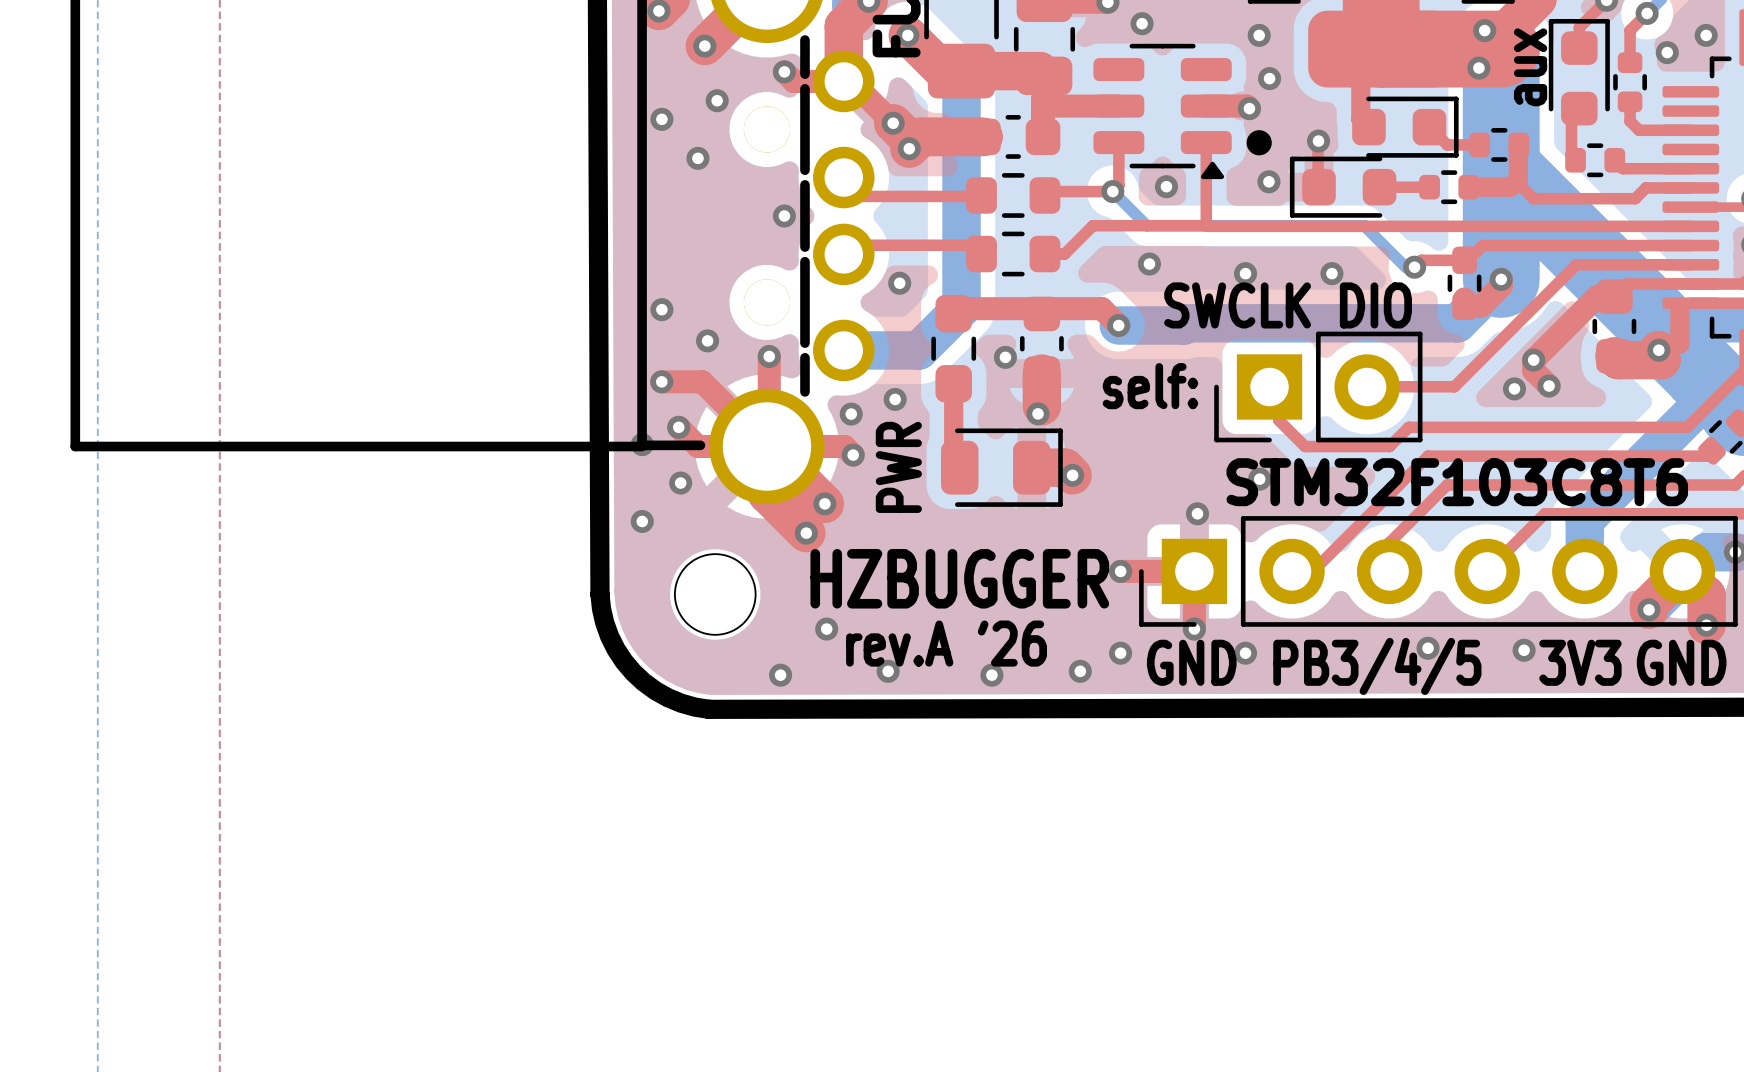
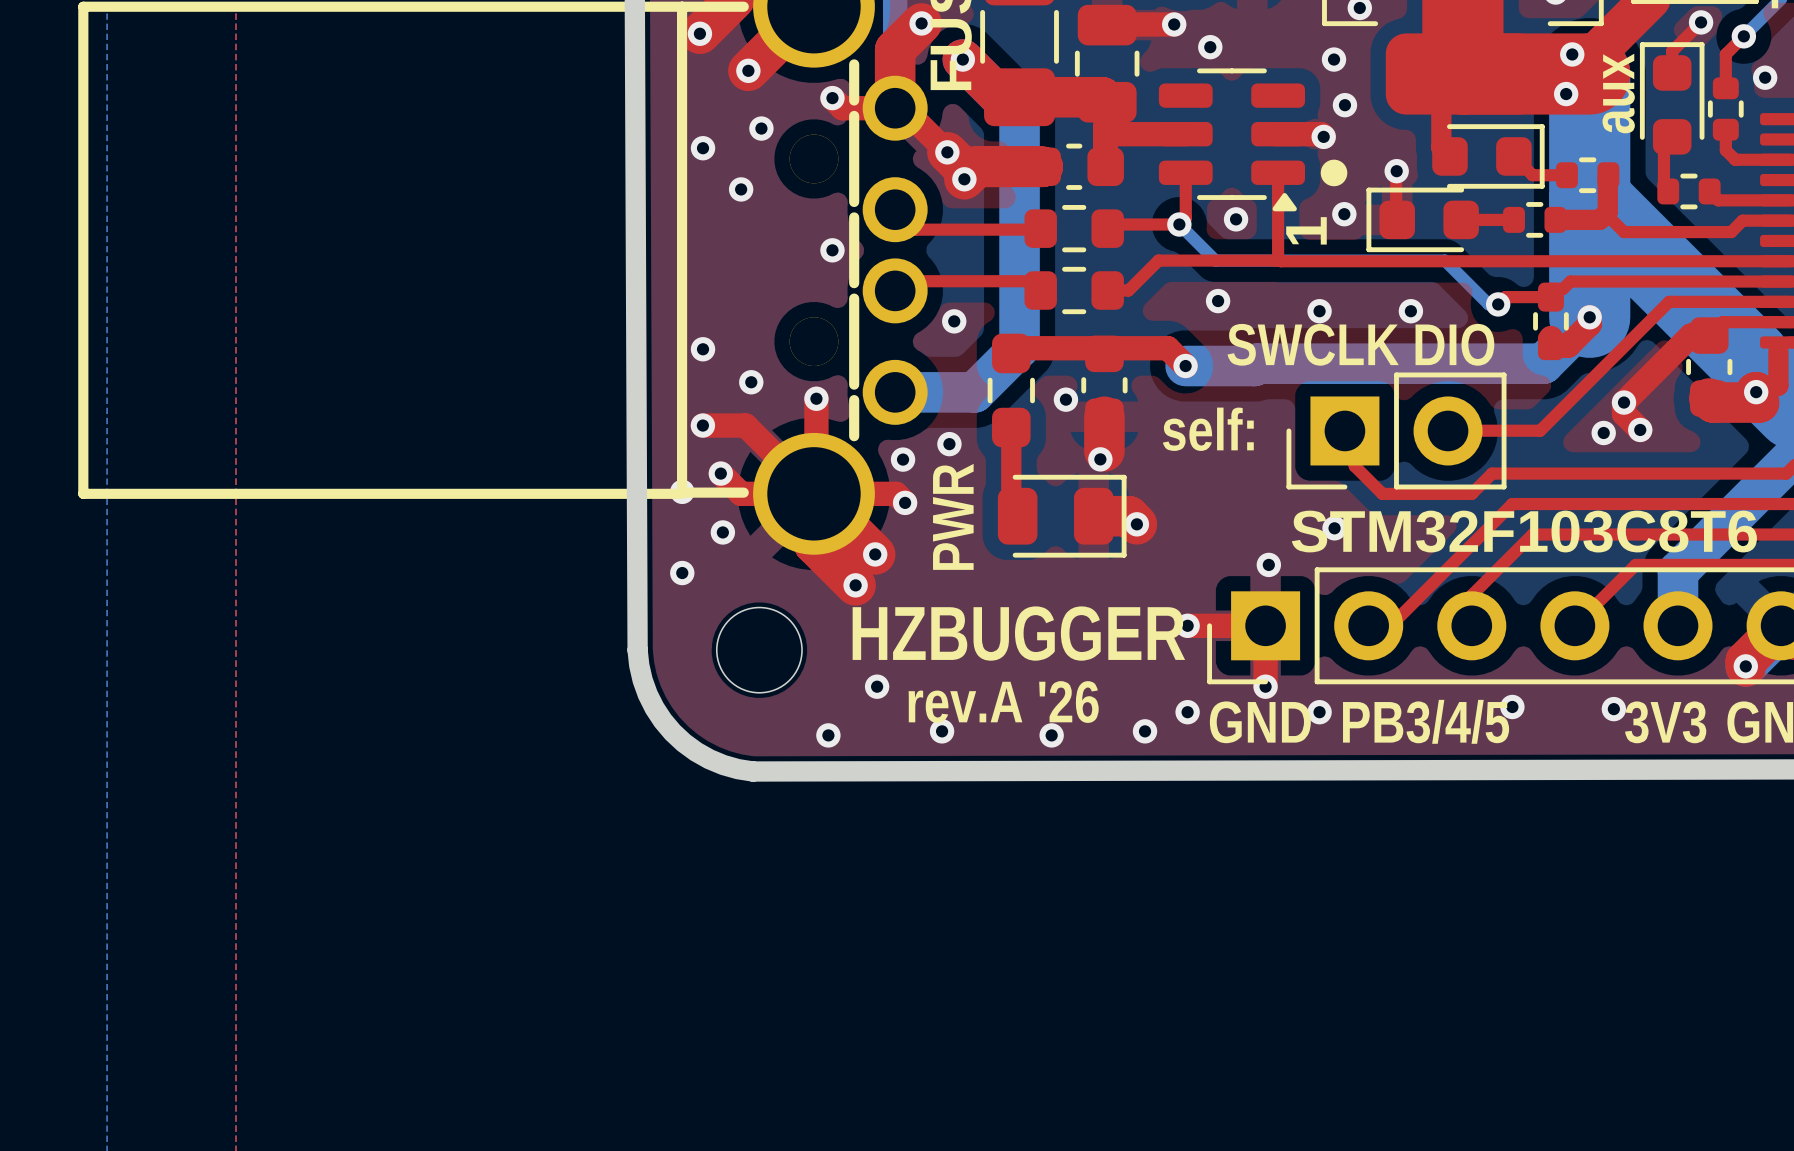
text: none -> 1 (1306, 230)

